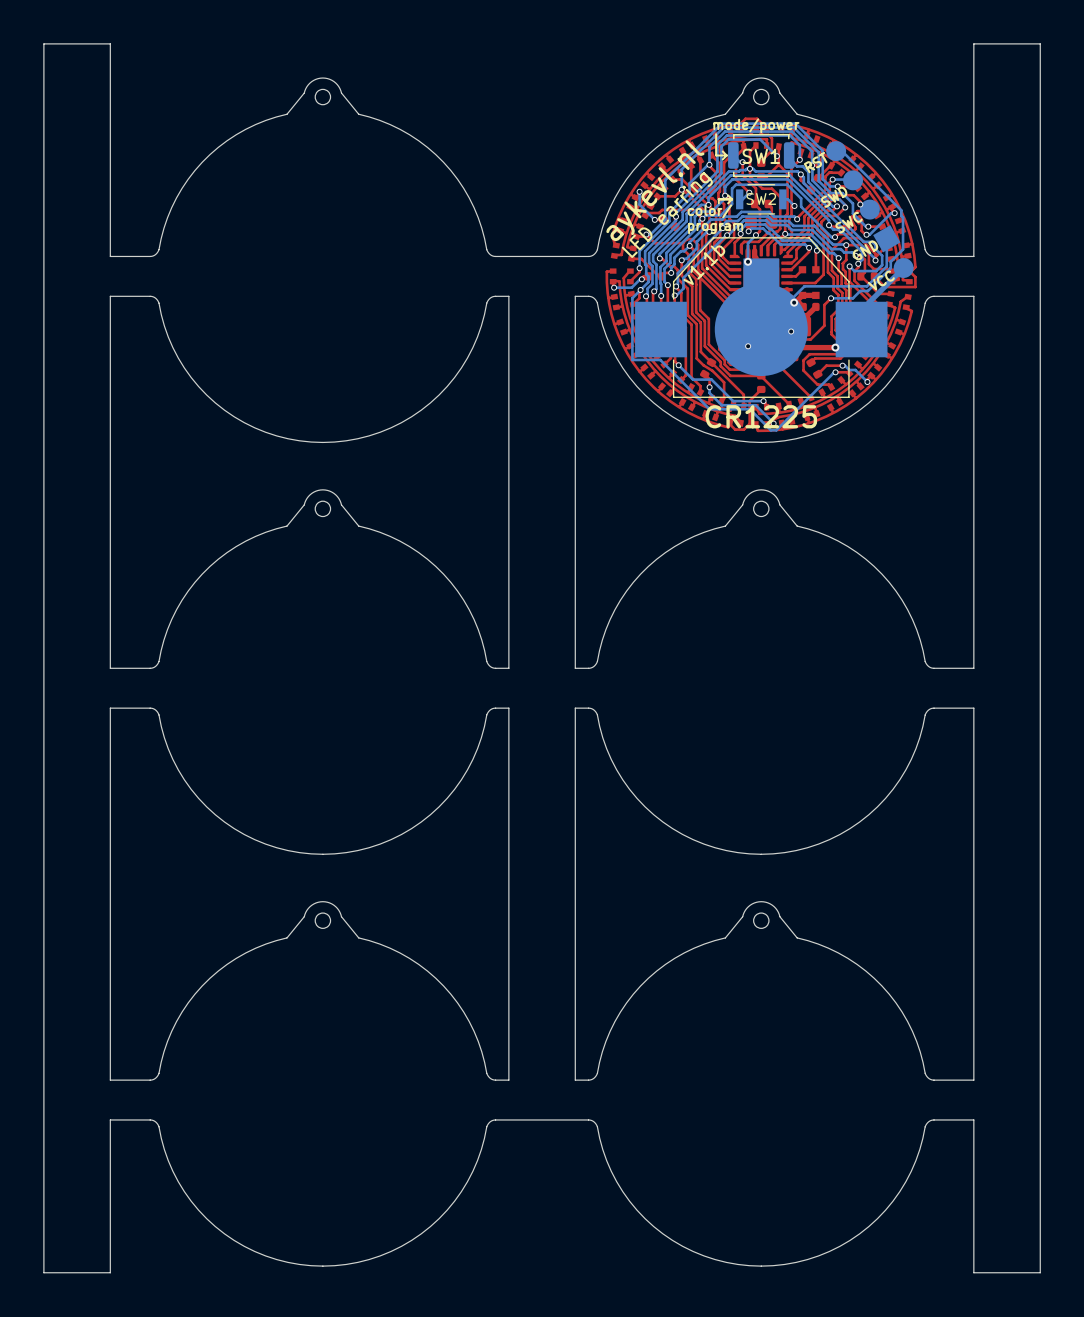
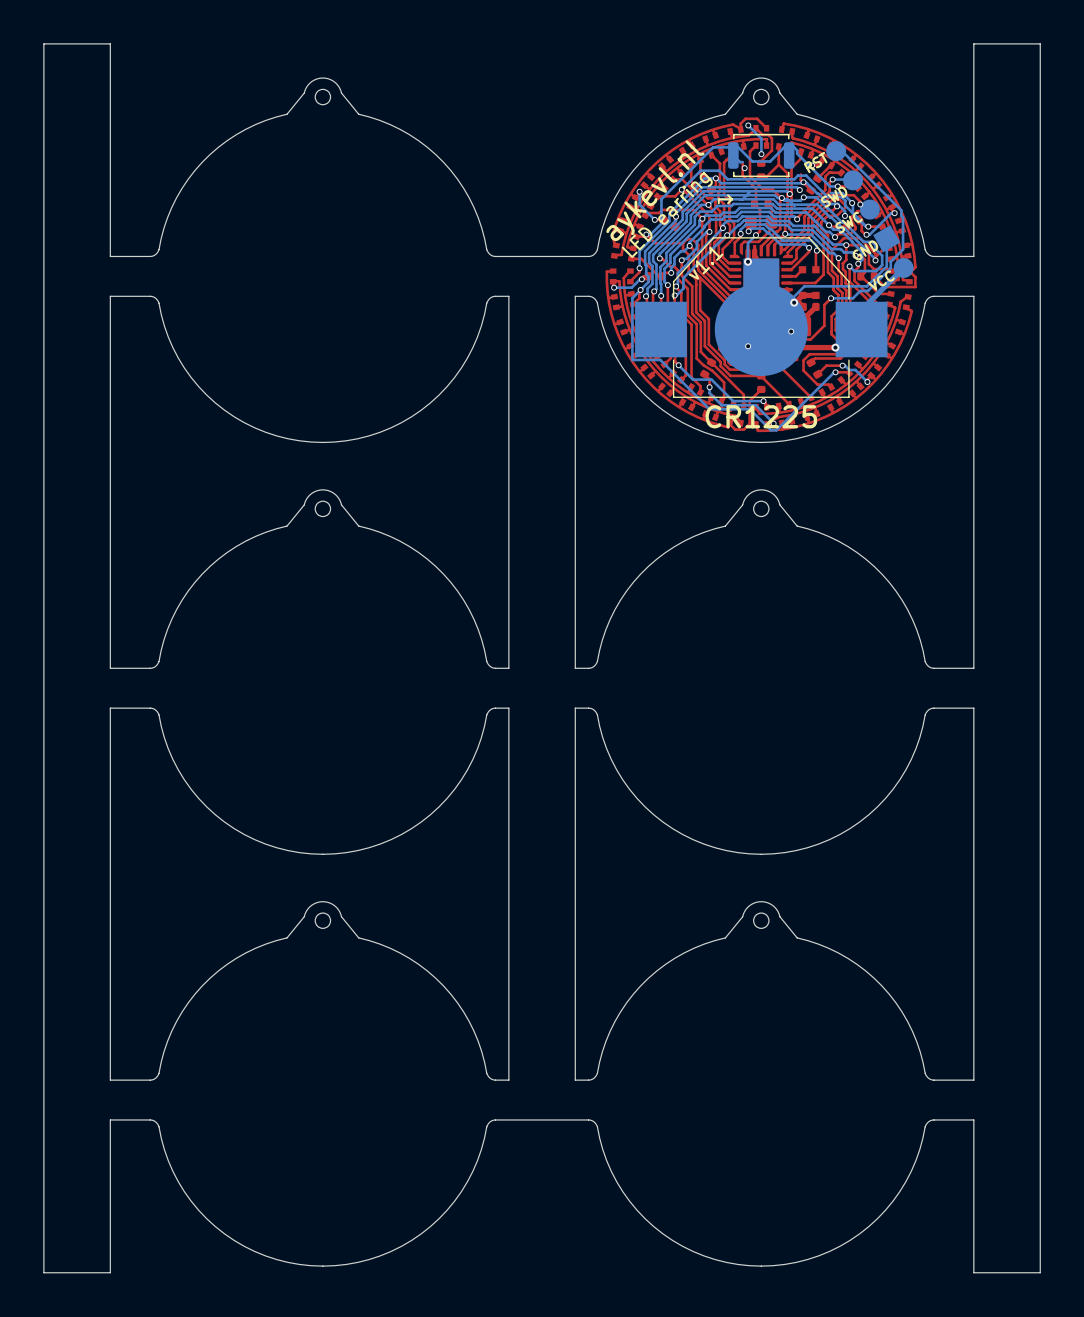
bottom track: none -> (748, 125) (761, 138) (761, 154)
via: none -> (748, 125)
text: mode/power (756, 125) -> none
line: (716, 134) (716, 155) (726, 155) -> none
top track: (743, 146) (736, 156) (736, 179) (749, 192) -> none
line: (722, 151) (726, 155) -> none
via: none -> (761, 154)
line: (726, 155) (722, 159) -> none
SW1 name: SW1 (761, 156) -> none
bottom track: (776, 156) (760, 139) (728, 139) (721, 146) (721, 173) (703, 191) -> (789, 194) (787, 191) (703, 191)
via: (776, 156) -> none
bottom track: (789, 157) (797, 166) (802, 166) (808, 172) (808, 182) (832, 206) (837, 206) -> none
bottom track: (799, 159) (799, 145) (790, 135) (726, 135) (717, 144) (717, 171) (701, 187) -> (799, 190) (797, 187) (701, 187)
via: (799, 159) -> none
via: (742, 162) -> none
top track: (709, 164) (715, 172) (715, 178) -> none
via: (709, 164) -> none
via: none -> (744, 168)
via: (749, 168) -> none
via: (800, 174) -> none
via: none -> (715, 178)
via: none -> (803, 182)
bottom track: (830, 186) (822, 179) (822, 150) (795, 123) (721, 123) (665, 180) (665, 219) (661, 223) -> (829, 186) (797, 153) (794, 147) (784, 147) (770, 161) (752, 161) (738, 147) (713, 147) (661, 199) (661, 223)
bottom track: (681, 189) (681, 169) (723, 127) (793, 127) (818, 152) (818, 181) (830, 193) -> (681, 189) (700, 170) (719, 170) (727, 179) (794, 179) (798, 175) (806, 175) (827, 197) (841, 197) (845, 200) (845, 205) (866, 226)
via: none -> (799, 190)
via: (749, 192) -> none
via: none -> (789, 194)
bottom track: (705, 195) (729, 171) (747, 168) (752, 168) (755, 171) (797, 171) (803, 177) (803, 183) (845, 223) -> (705, 195) (775, 195) (784, 200) (800, 200) (803, 197) (816, 197) (845, 223)
via: (725, 195) -> none
via: none -> (803, 197)
via: none -> (781, 198)
SW2: (761, 199) -> none
bottom track: none -> (837, 203) (844, 211) (844, 215)
via: none -> (852, 203)
bottom track: (708, 204) (708, 197) (730, 175) (789, 175) (839, 225) -> (708, 204) (714, 199) (773, 199) (778, 204) (817, 204) (839, 225)
bottom track: (717, 205) (725, 198) (724, 187) (732, 179) (788, 179) (829, 220) (829, 225) -> (717, 205) (772, 203) (777, 208) (812, 208) (829, 225)
via: (794, 205) -> none
bottom track: (845, 207) (839, 199) (831, 199) (812, 180) (812, 151) (792, 131) (725, 131) (709, 147) (709, 164) (689, 183) (689, 192) (669, 213) -> (838, 203) (828, 203) (806, 182) (721, 183) (716, 178) (704, 178) (669, 213)
via: (845, 207) -> none
text: color/ (709, 211) -> none
bottom track: (723, 212) (732, 204) (732, 188) (736, 184) (787, 184) (801, 198) (801, 206) (831, 237) (835, 237) -> (723, 212) (735, 212) (739, 207) (770, 207) (775, 212) (806, 212) (826, 231) (829, 231) (835, 237)
via: none -> (844, 215)
text: program (715, 228) -> none
text: v1.1b (704, 265) -> v1.1 (706, 263)

